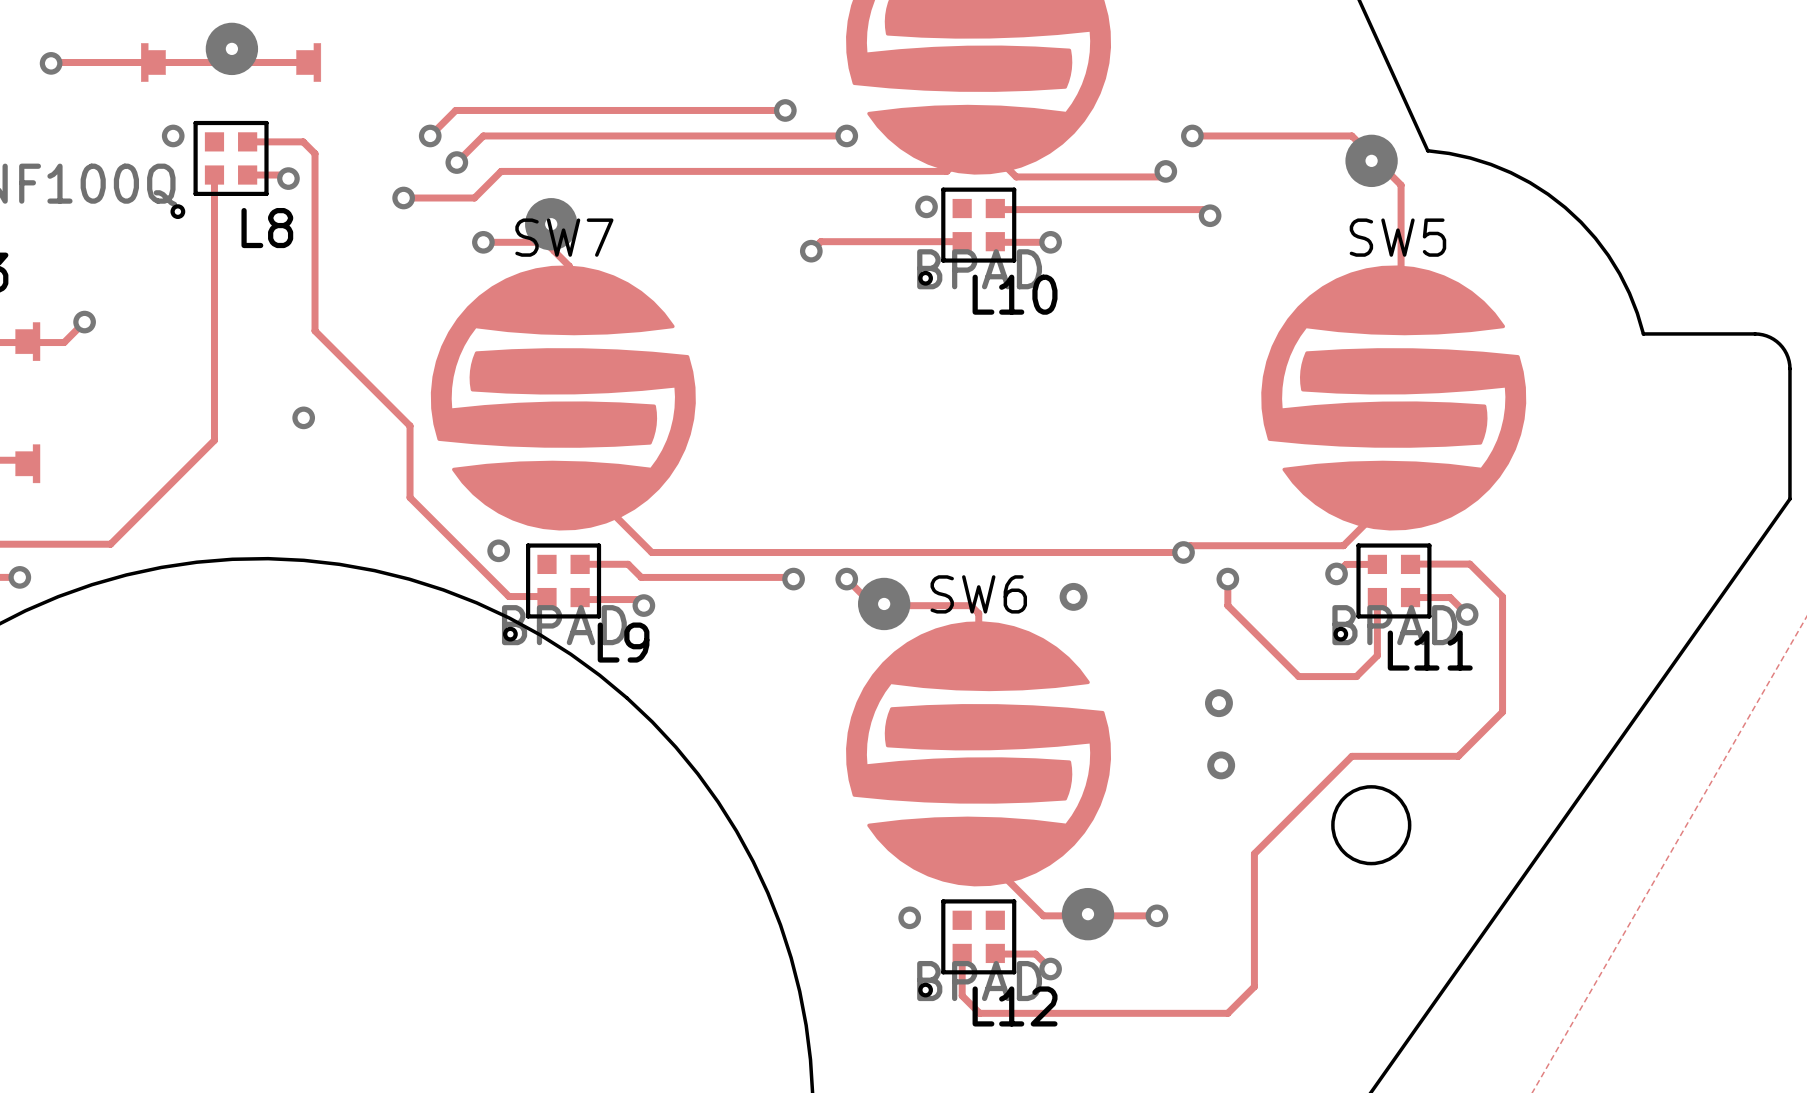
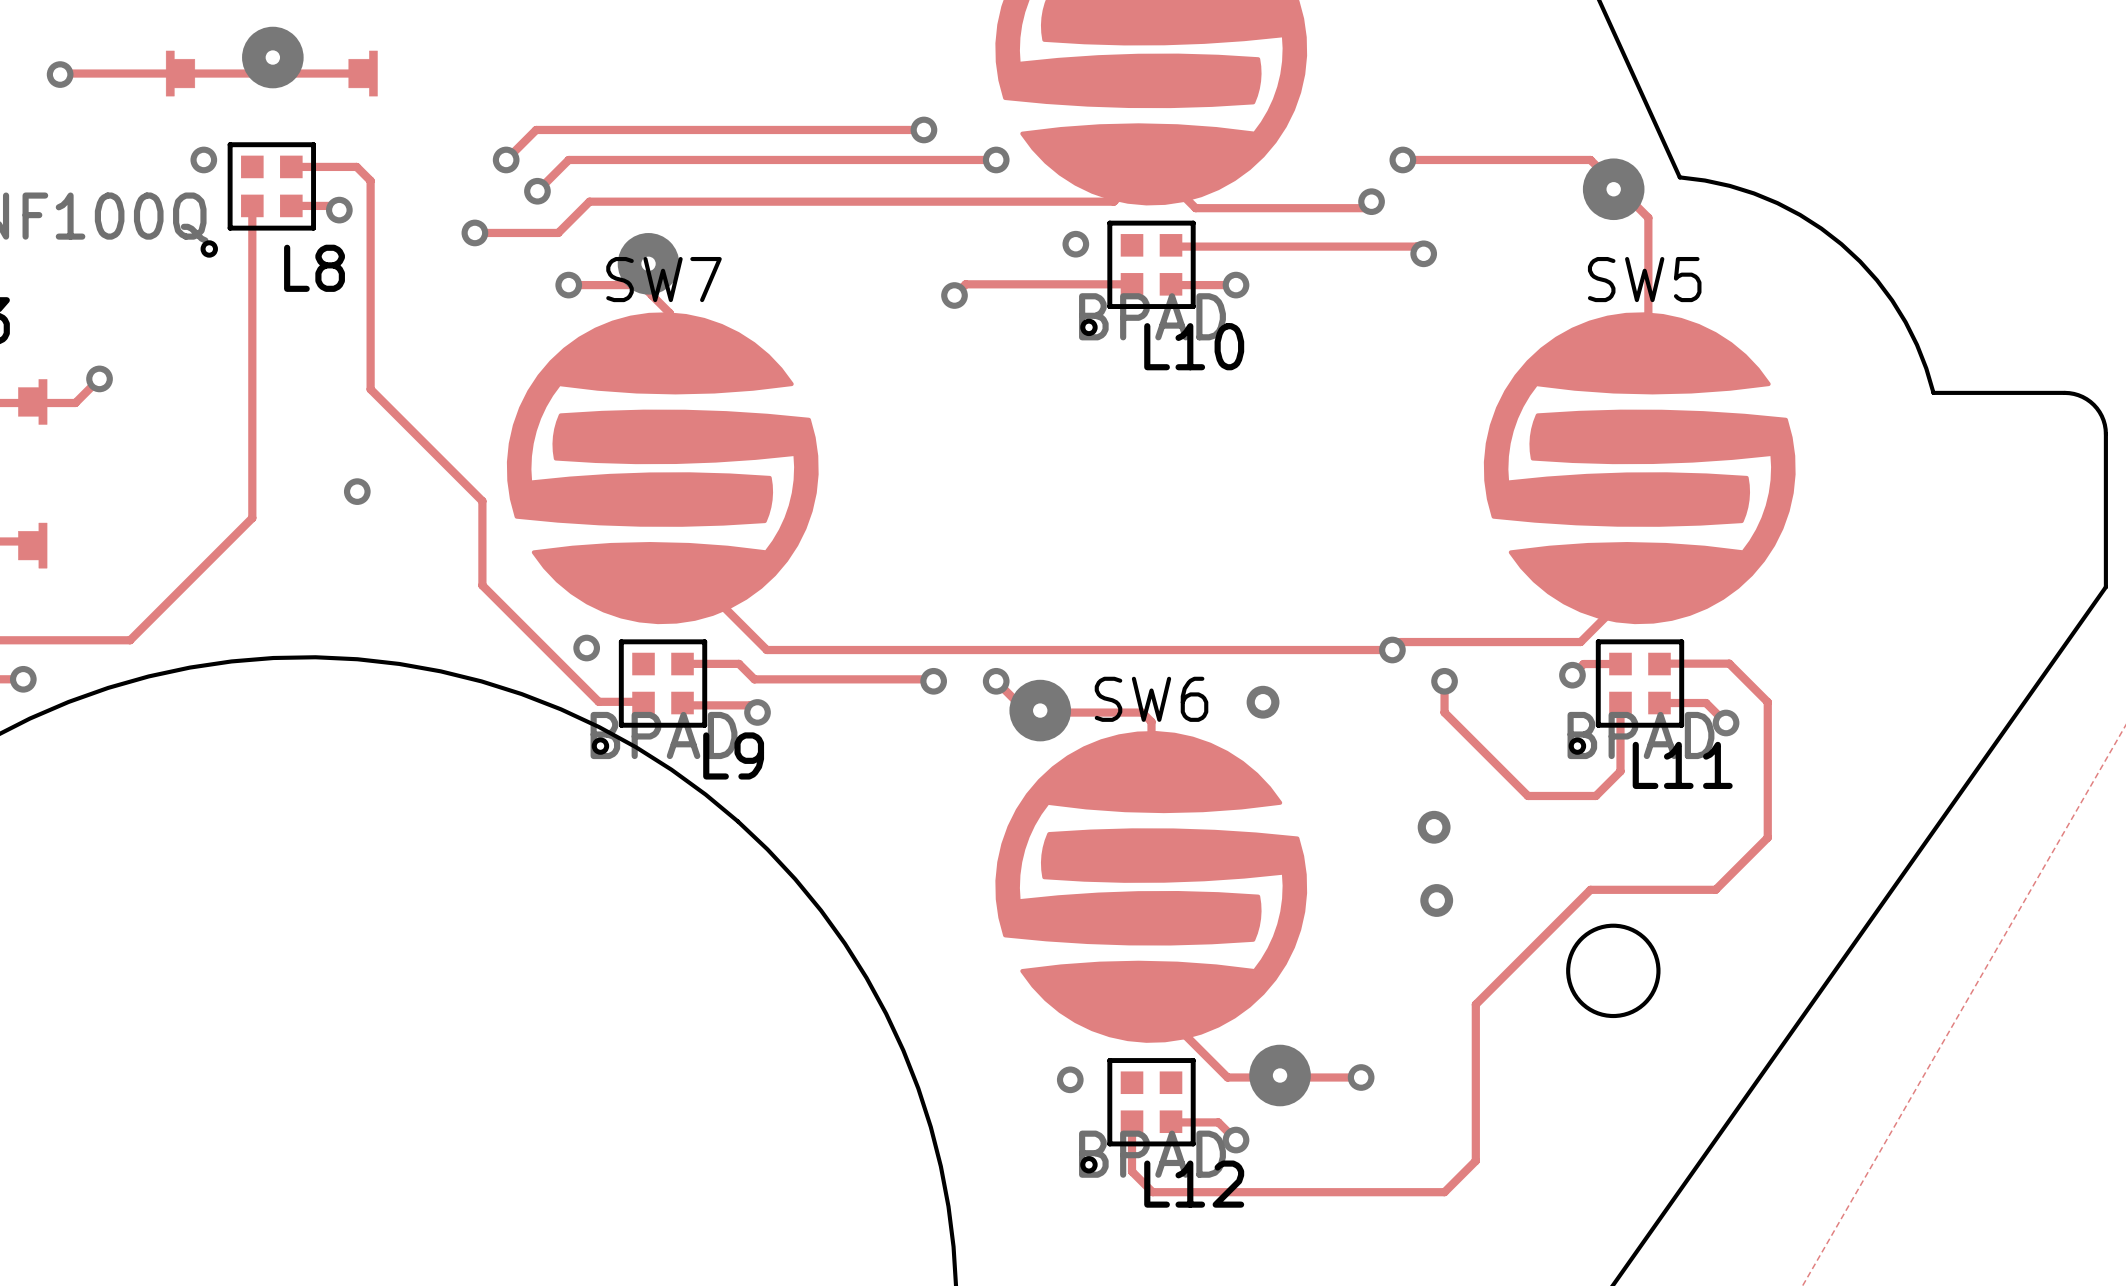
via position: (926, 206) -> (1075, 244)

